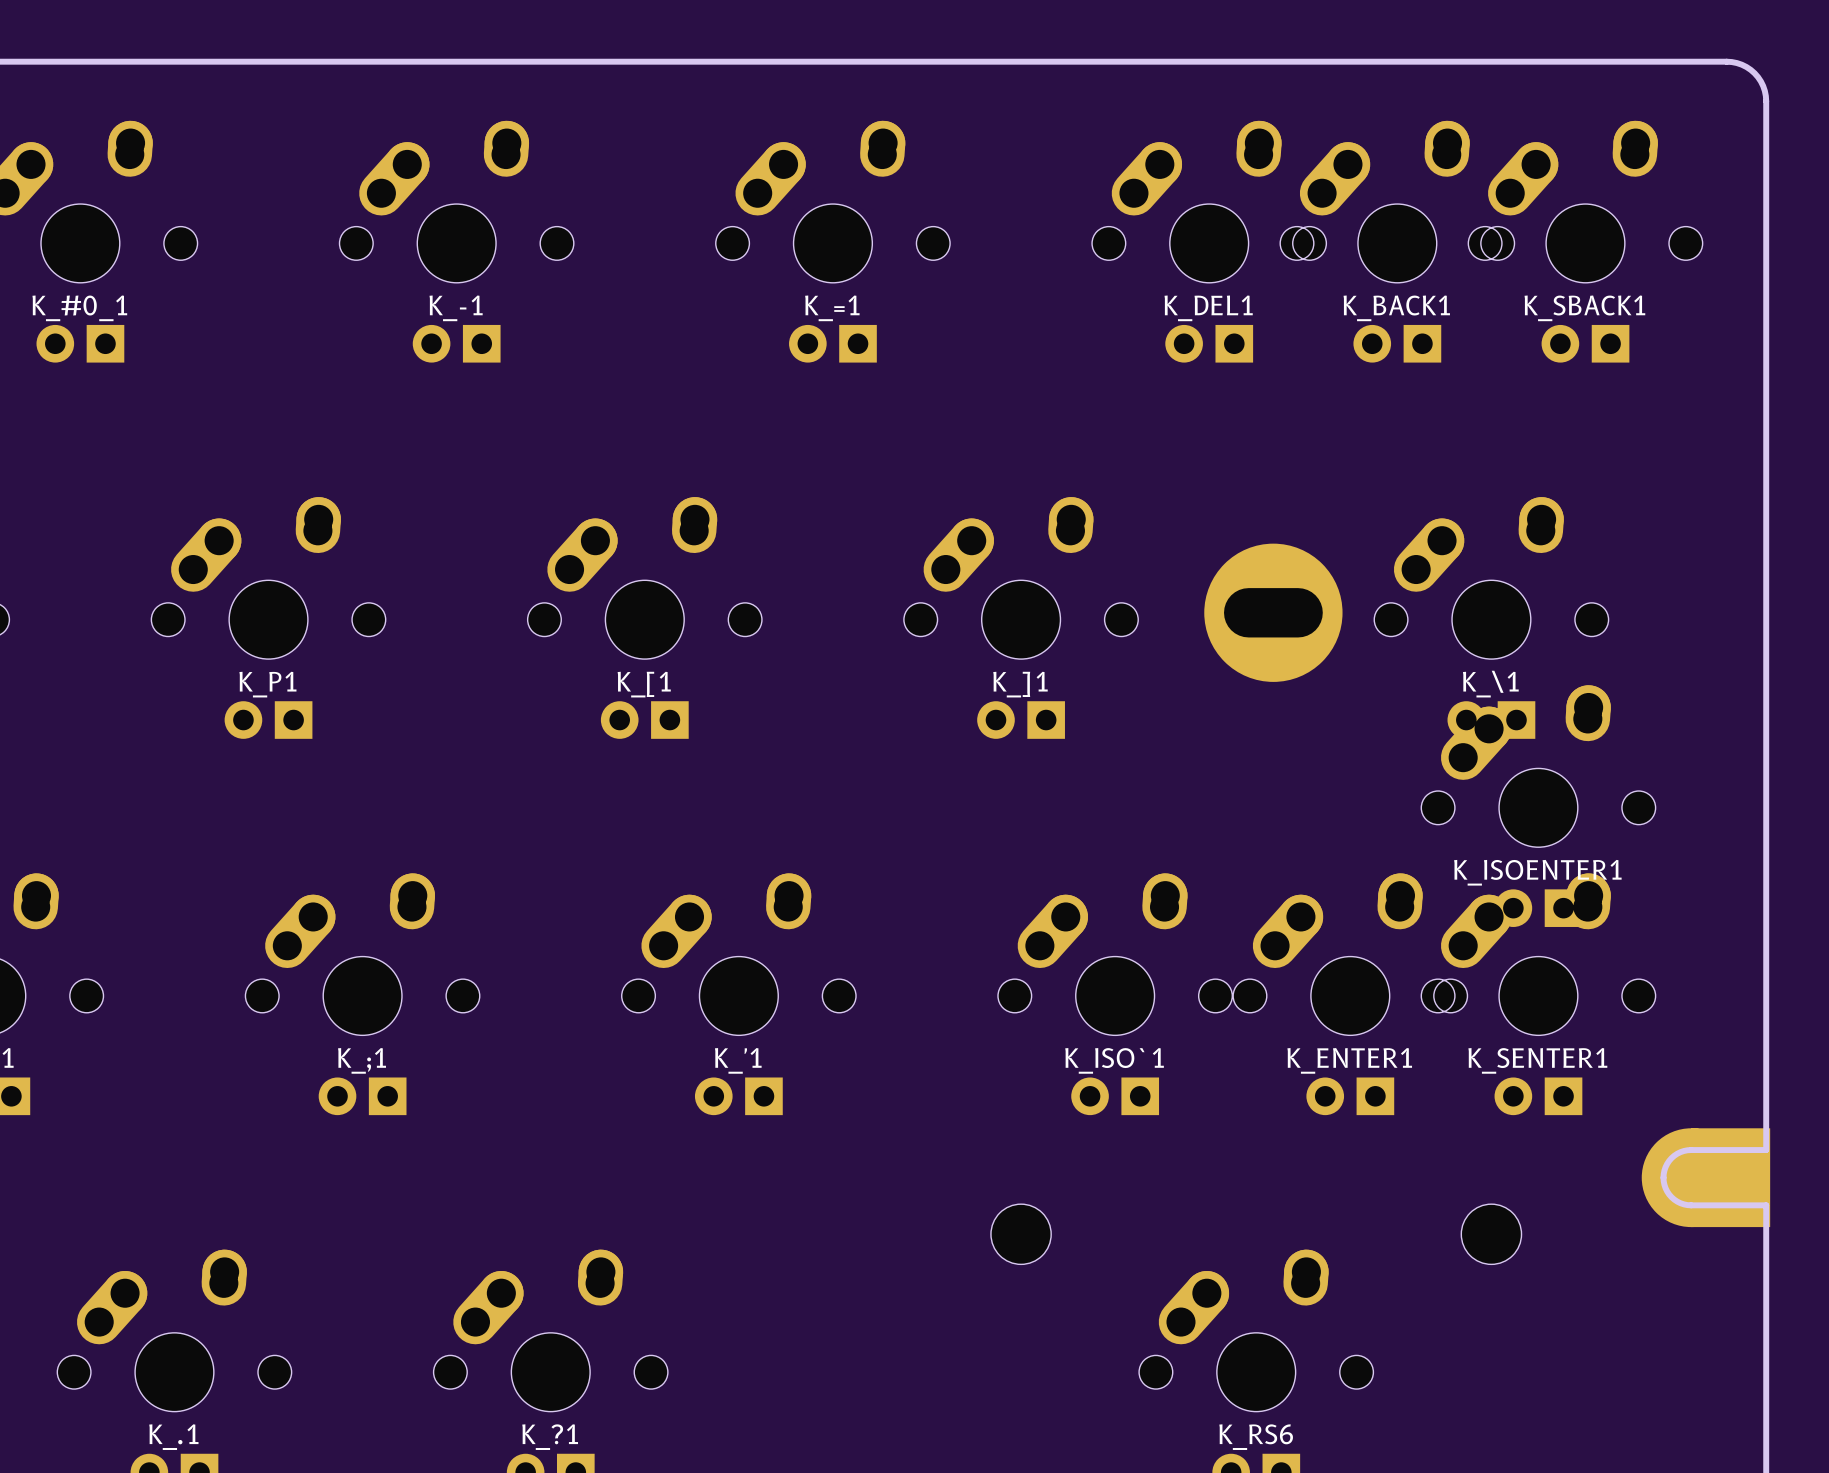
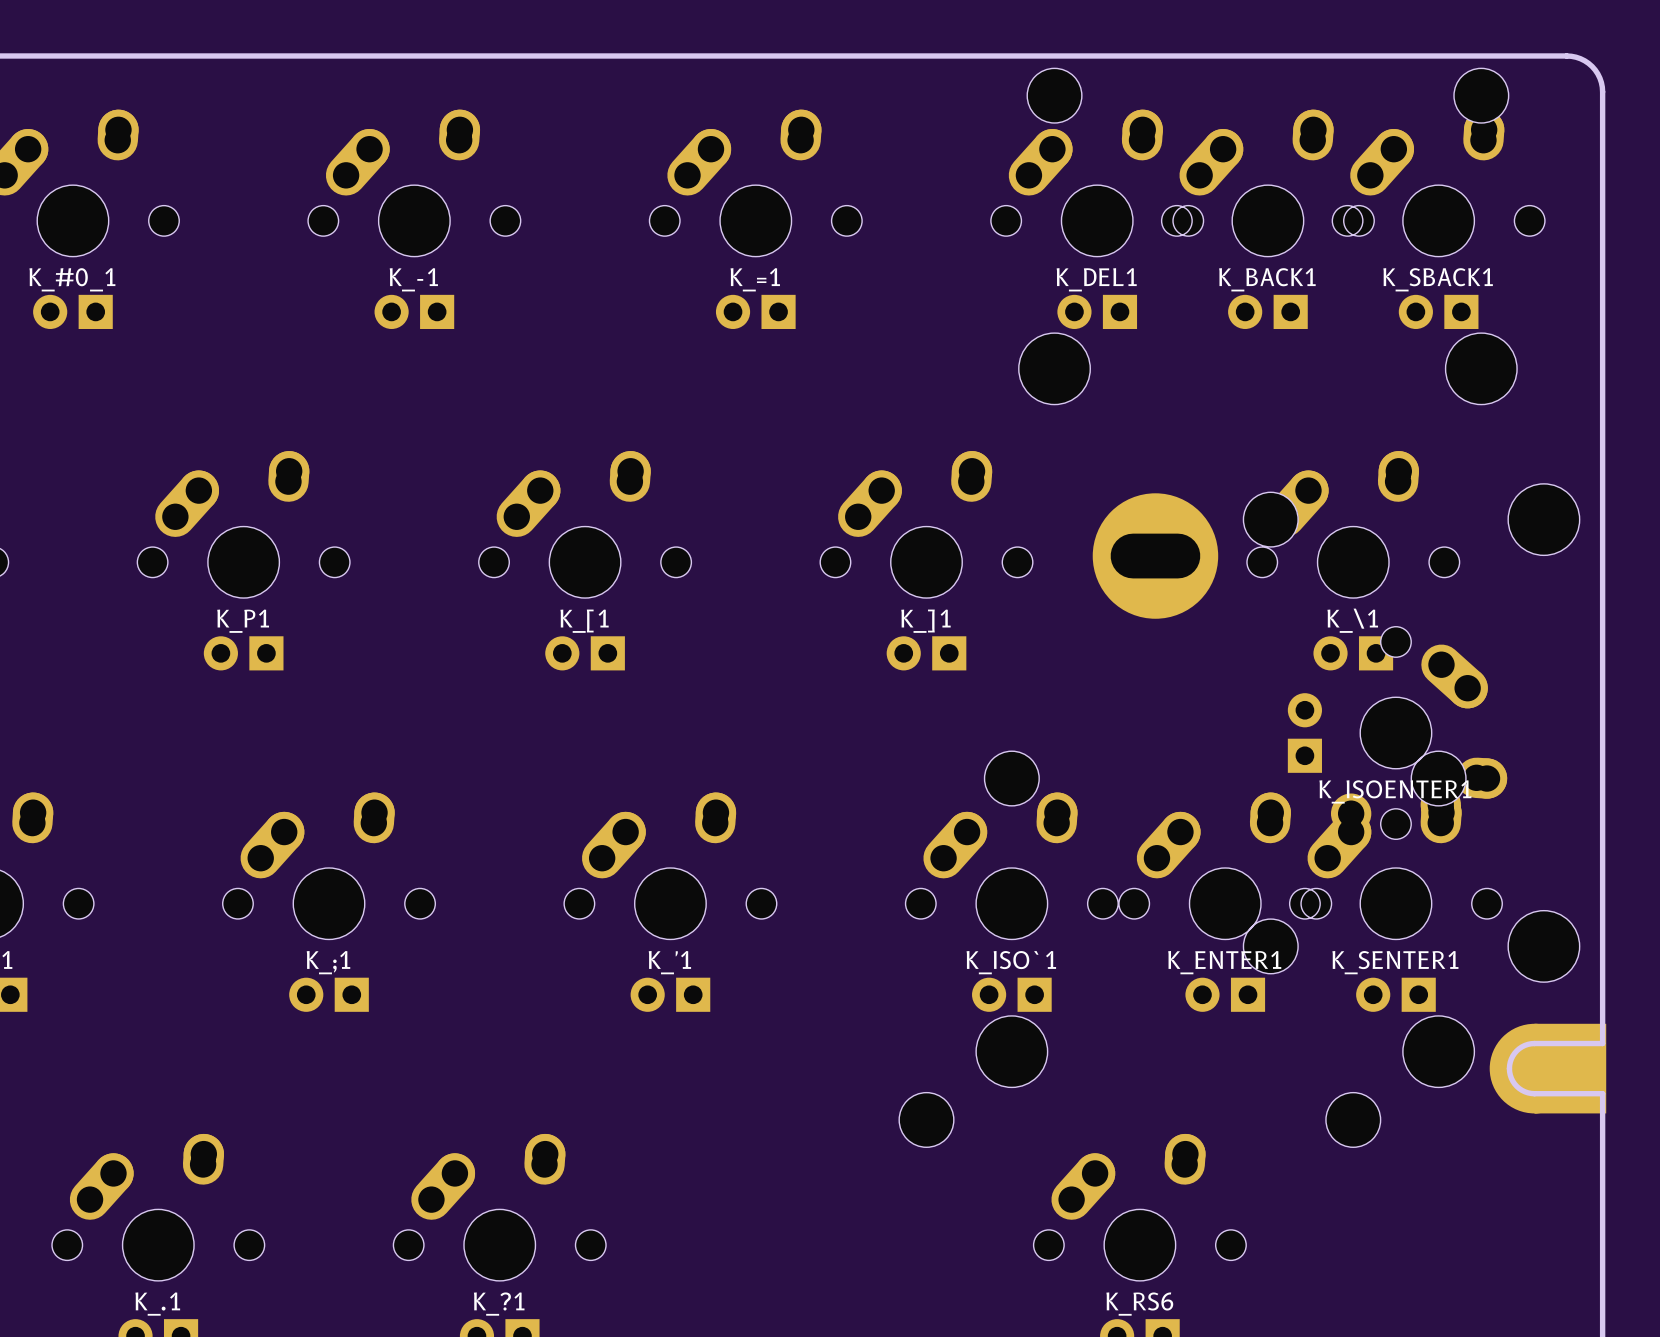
K_BACK1 footprint: [1280, 120, 1515, 363] -> [1018, 68, 1518, 405]
K_ISOENTER1 footprint: [1421, 685, 1656, 927] -> [1243, 483, 1580, 983]
K_ENTER1 footprint: [1233, 873, 1468, 1116] -> [976, 751, 1475, 1088]

